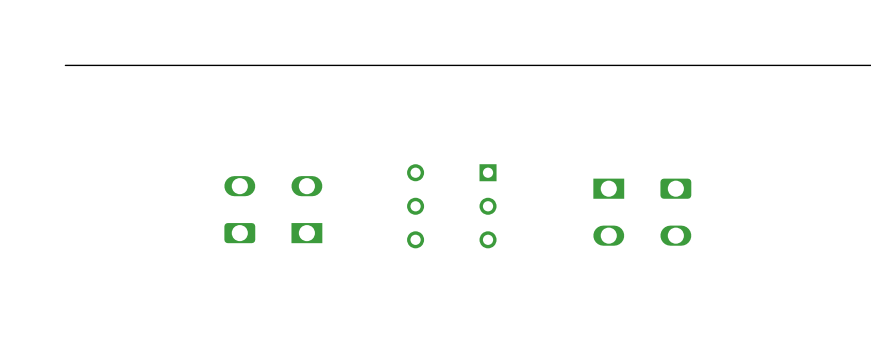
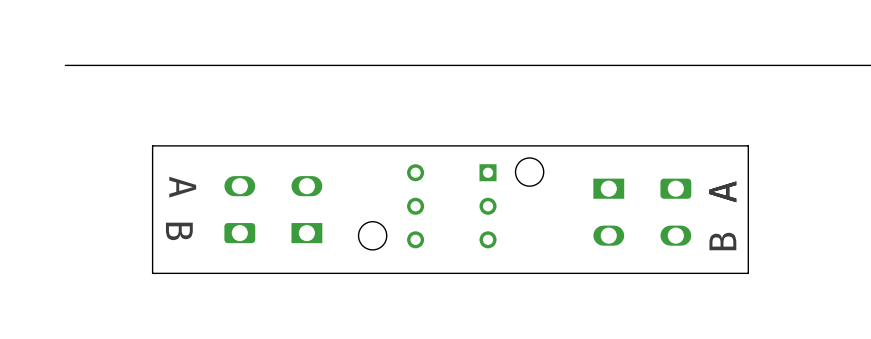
board edge: none -> (748, 145) (152, 145) (152, 273) (748, 273) (748, 145)
round board edge: none -> [515, 157, 545, 187]
text: none -> A (182, 187)
text: none -> A (722, 191)
round board edge: none -> [358, 221, 388, 251]
text: none -> B (179, 231)
text: none -> B (722, 241)

